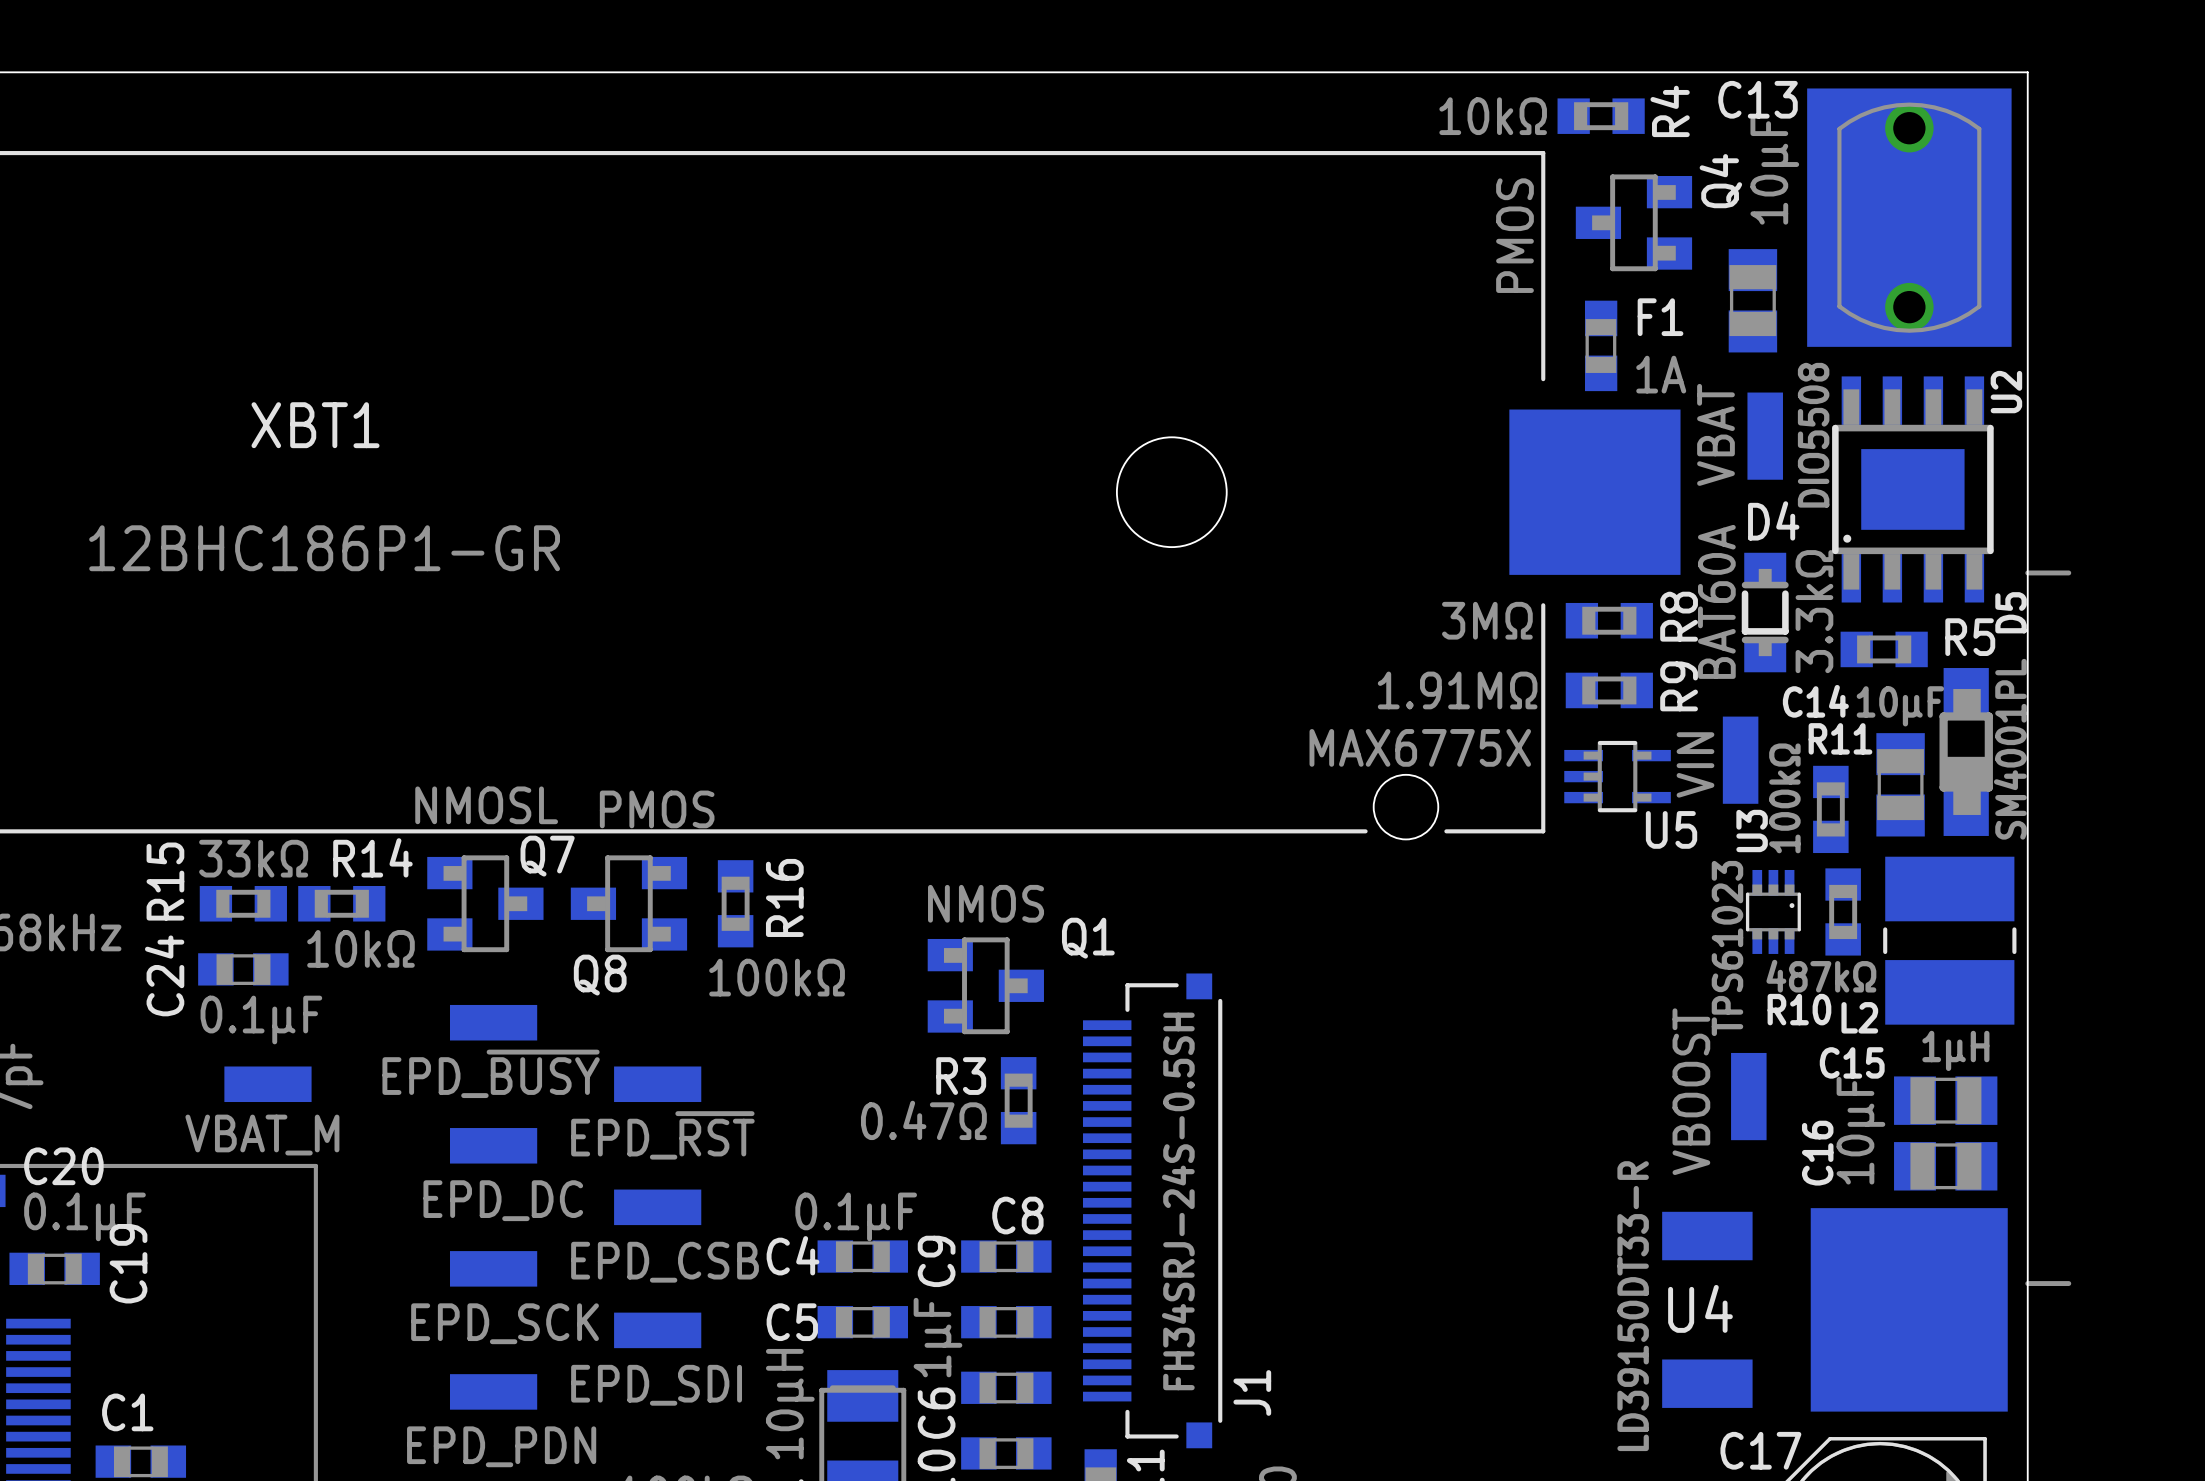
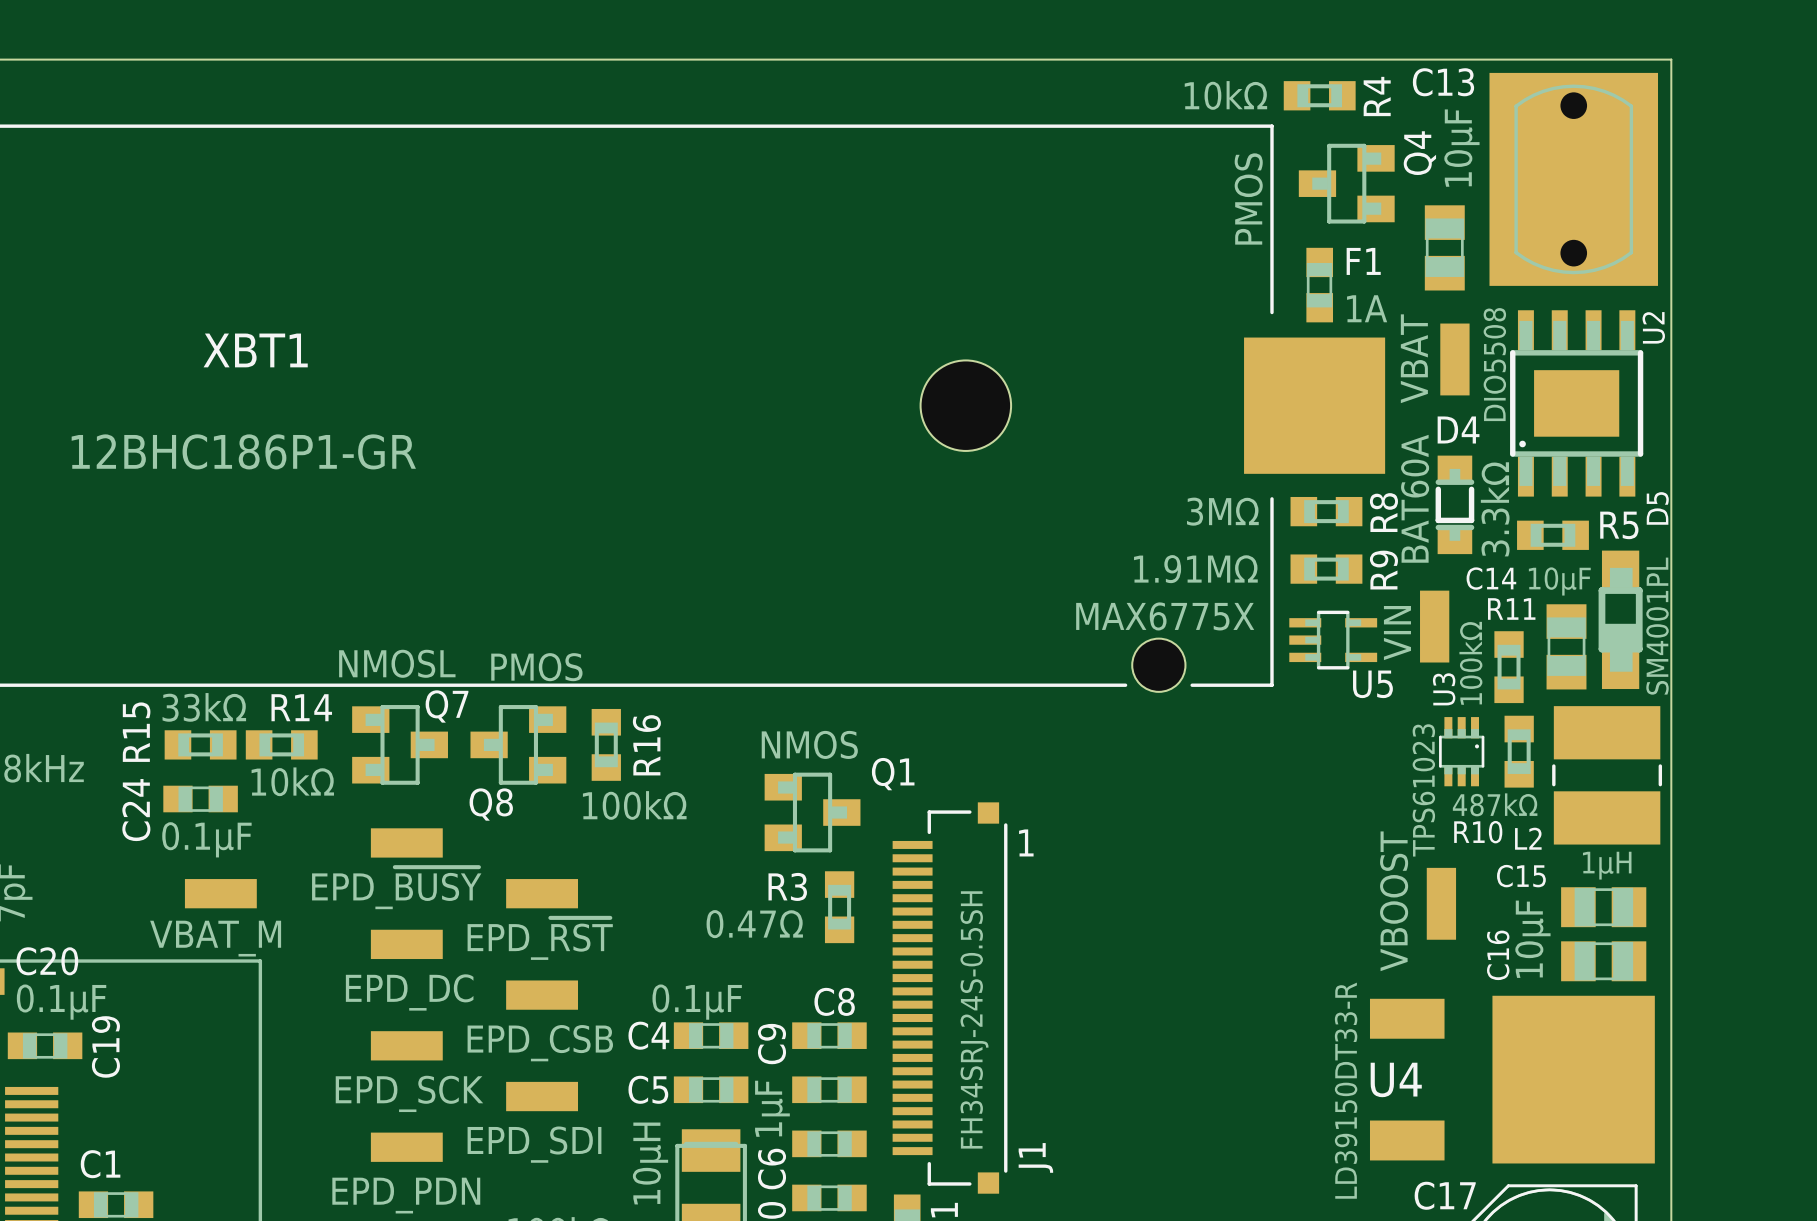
line: (2068, 572) (2027, 572) -> none
text: none -> 1 (1026, 842)
line: (2068, 1283) (2027, 1283) -> none

